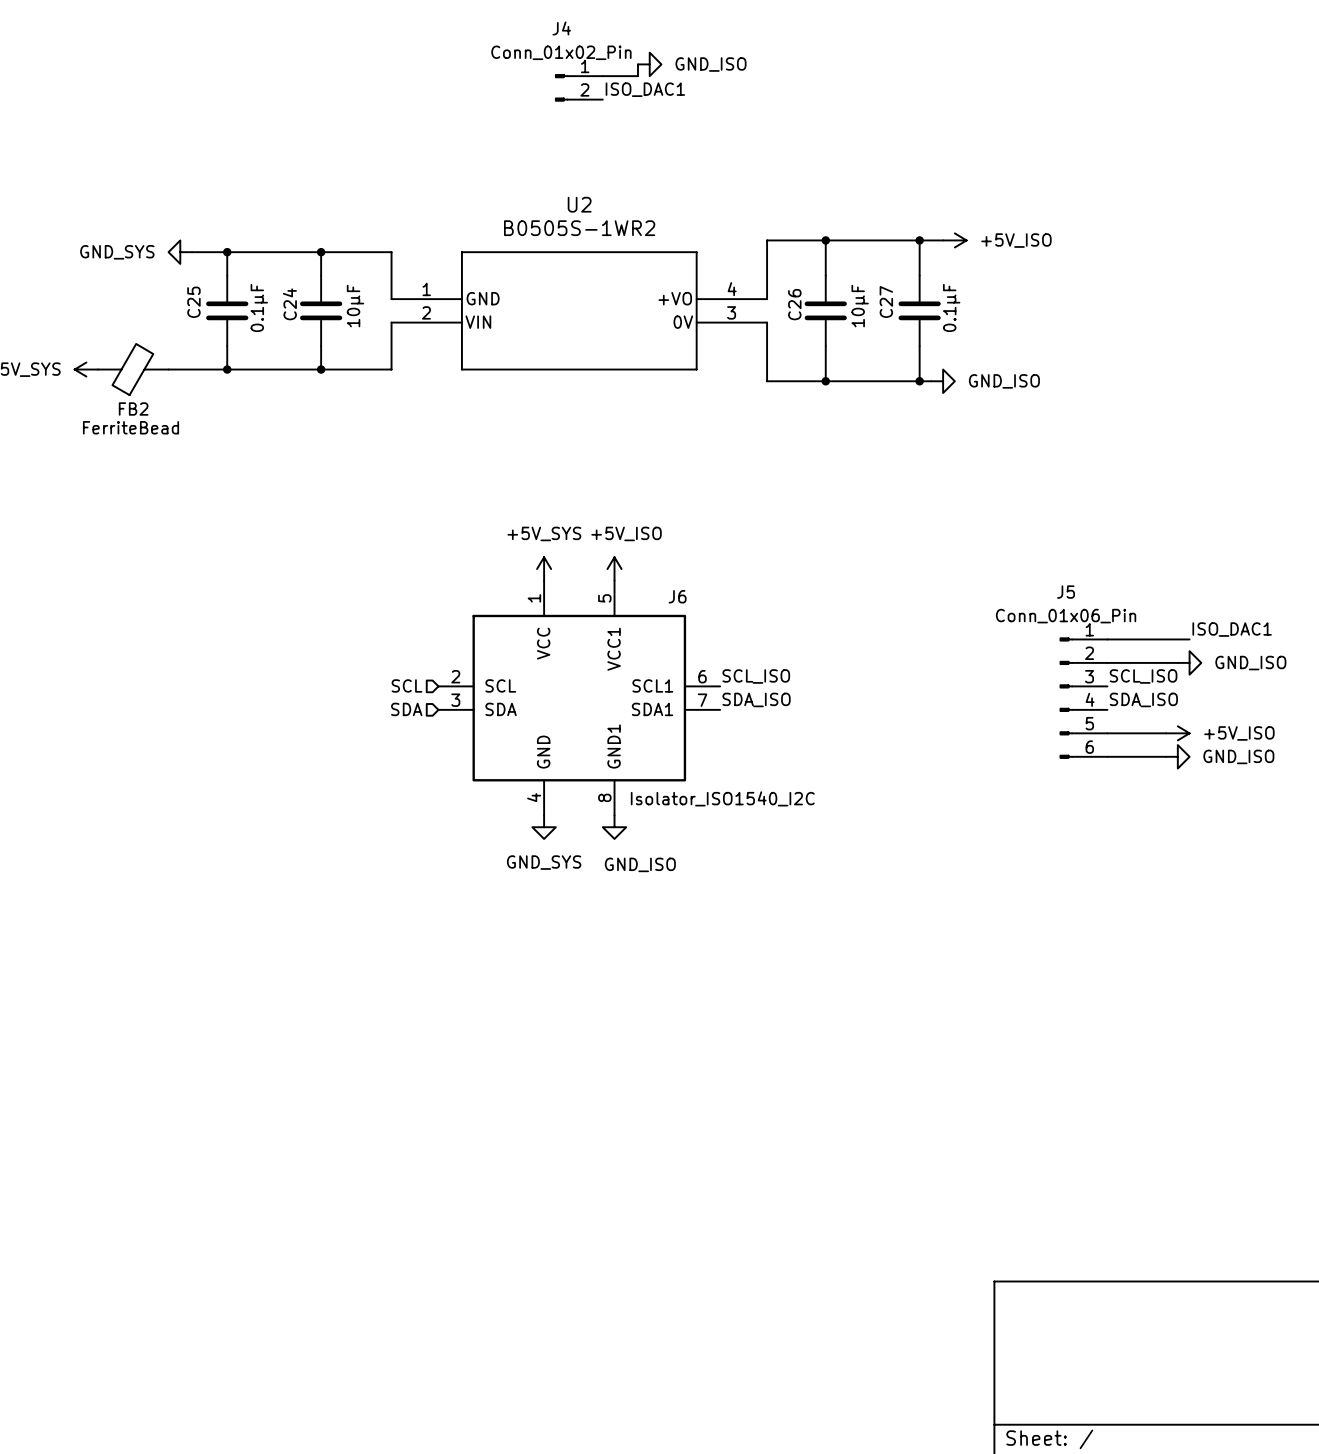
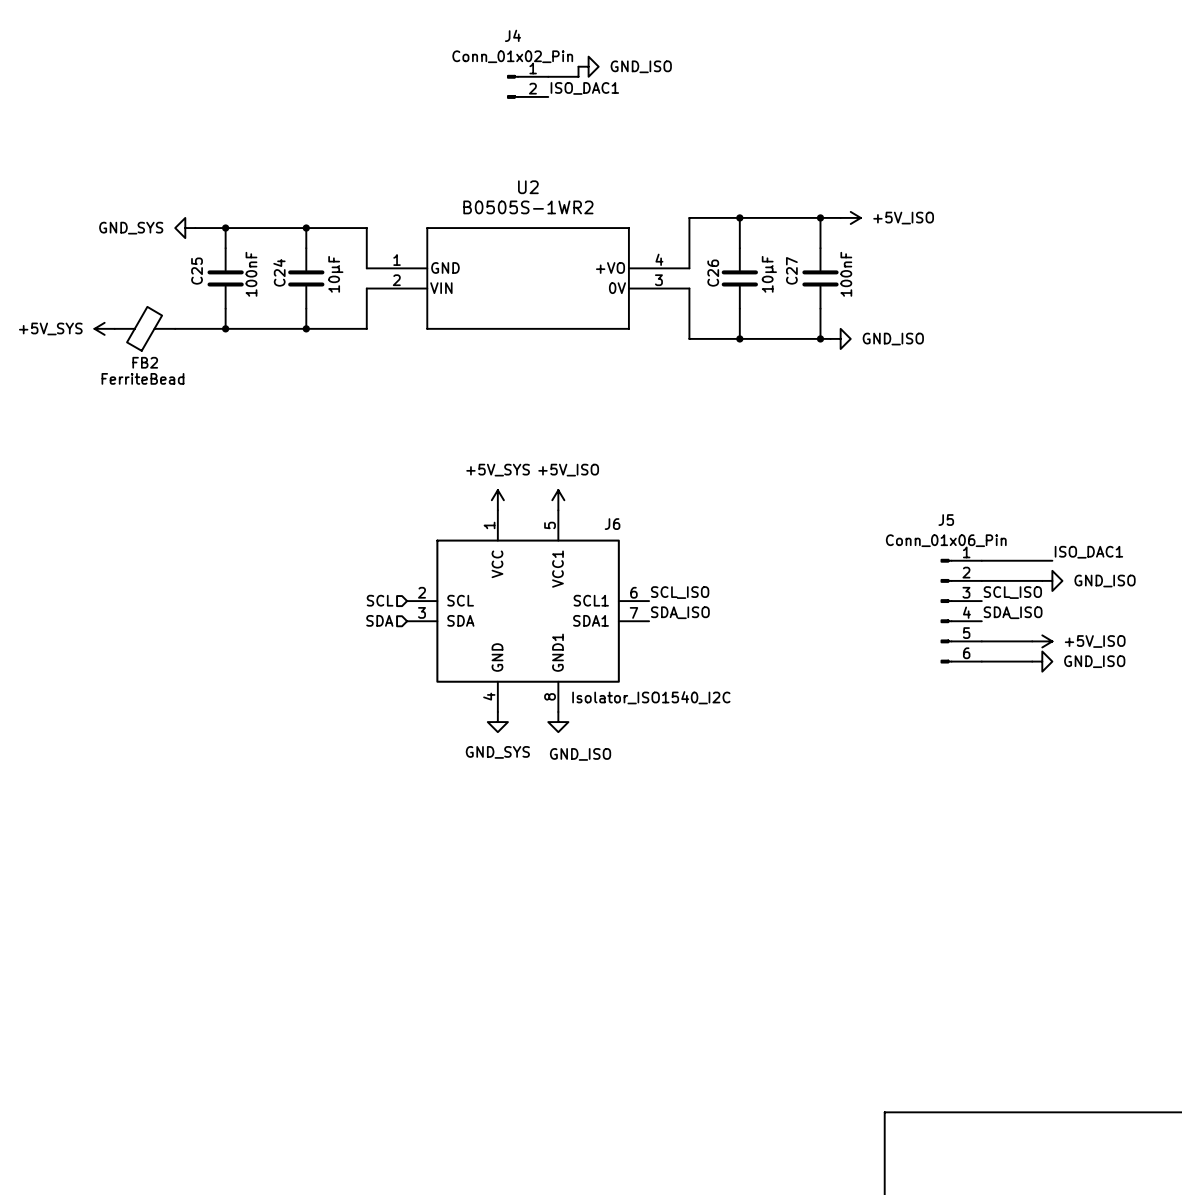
C25 value: 0.1µF (259, 307) -> 100nF (251, 274)
C27 value: 0.1µF (951, 307) -> 100nF (846, 274)

